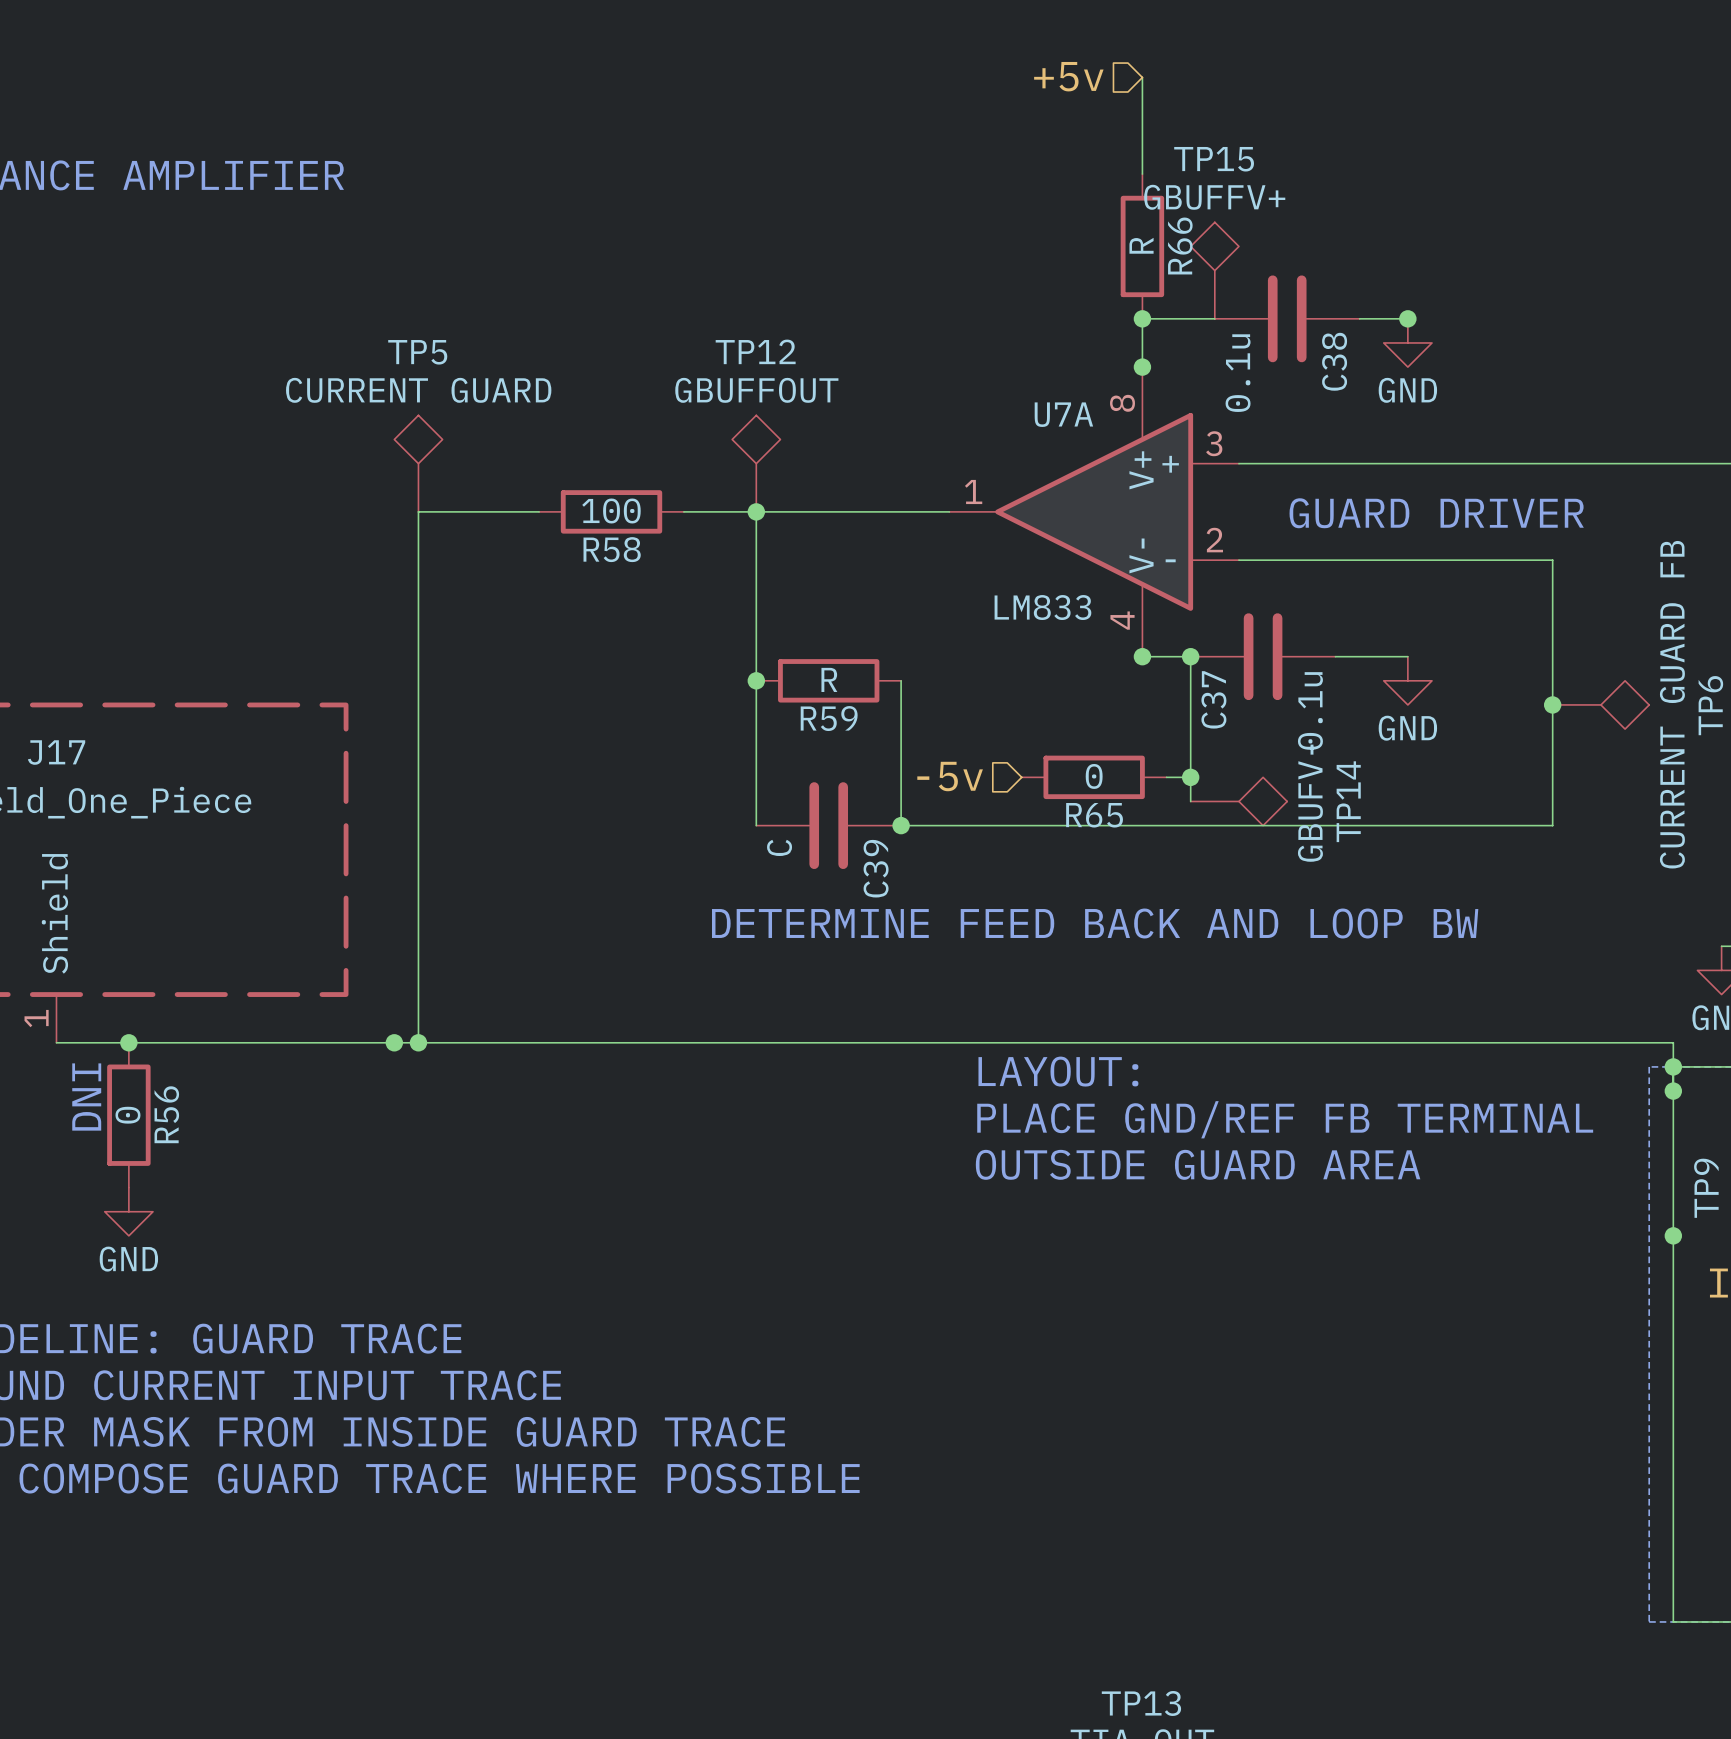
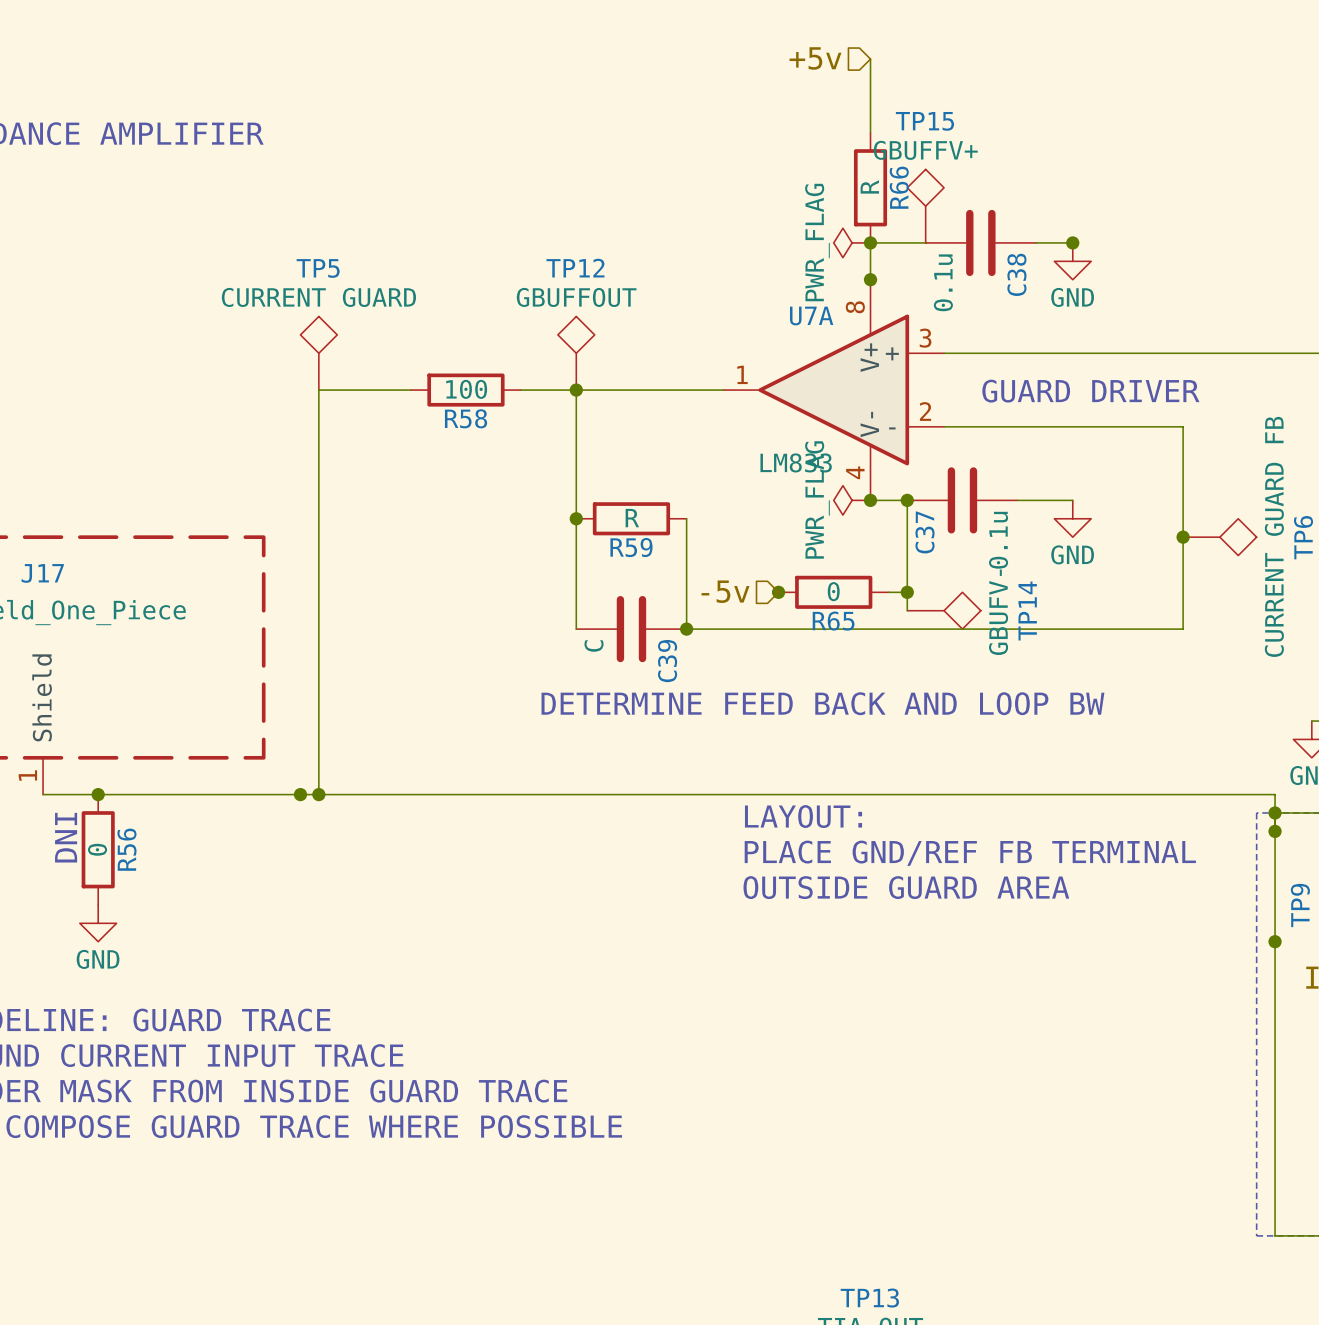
power symbol: none -> PWR_FLAG (852, 242)
power symbol: none -> PWR_FLAG (852, 500)
junction: none -> (778, 592)

